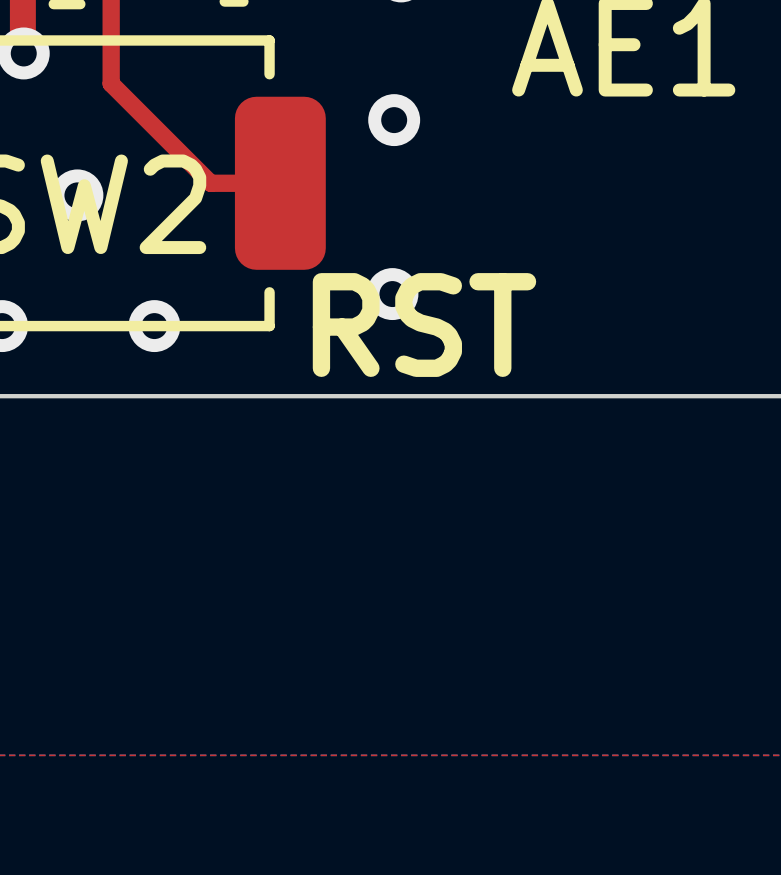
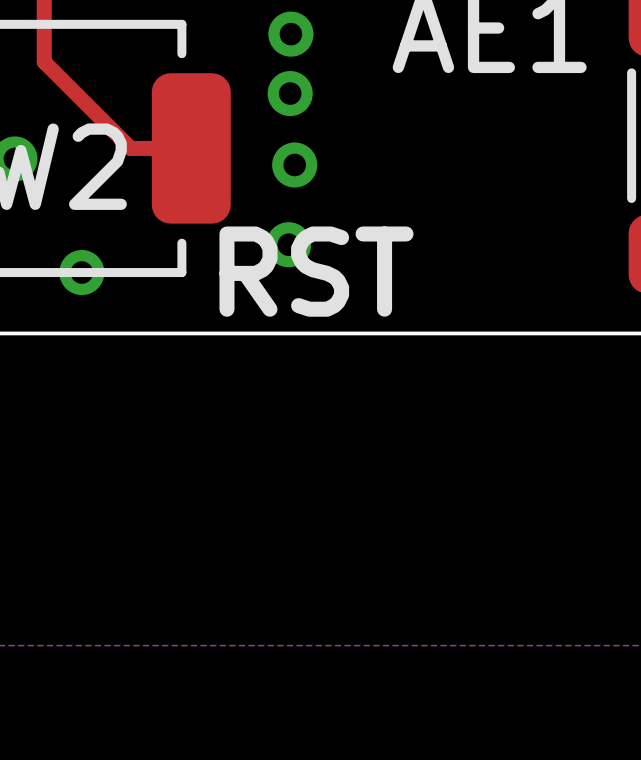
via: none -> (290, 34)
via: none -> (294, 164)

